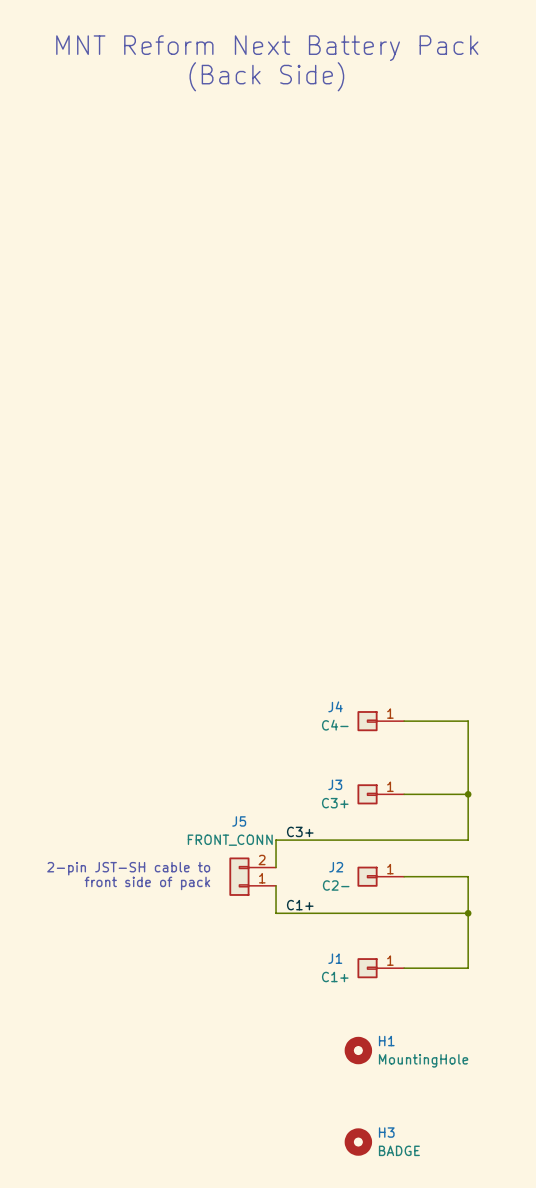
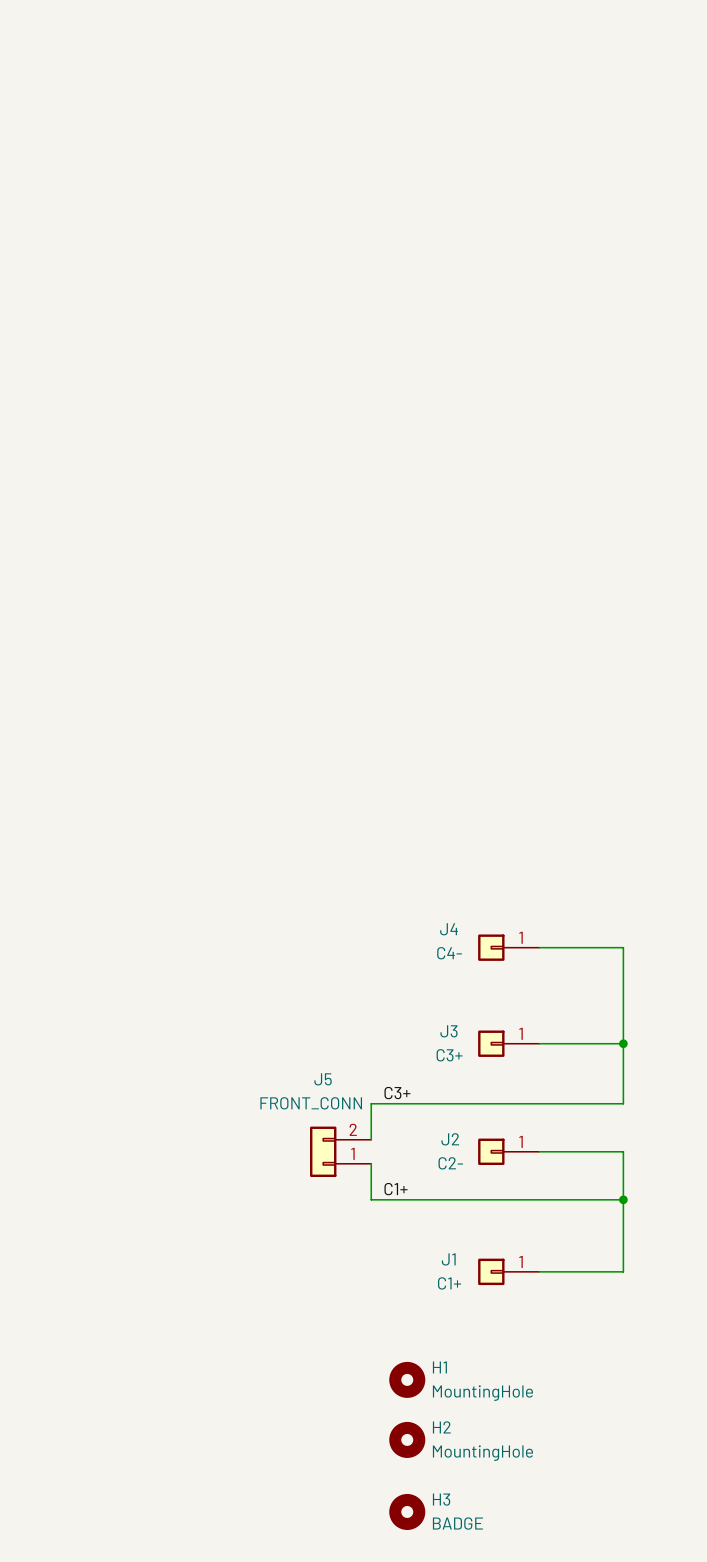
text: MNT Reform Next Battery Pack (267, 48) -> none
text: (Back Side) (266, 76) -> none
text: 2-pin JST-SH cable to (128, 868) -> none
text: front side of pack (147, 883) -> none
H1 position: (358, 1050) -> (407, 1379)
H2: none -> MountingHole (407, 1439)
H3 position: (358, 1142) -> (407, 1511)

